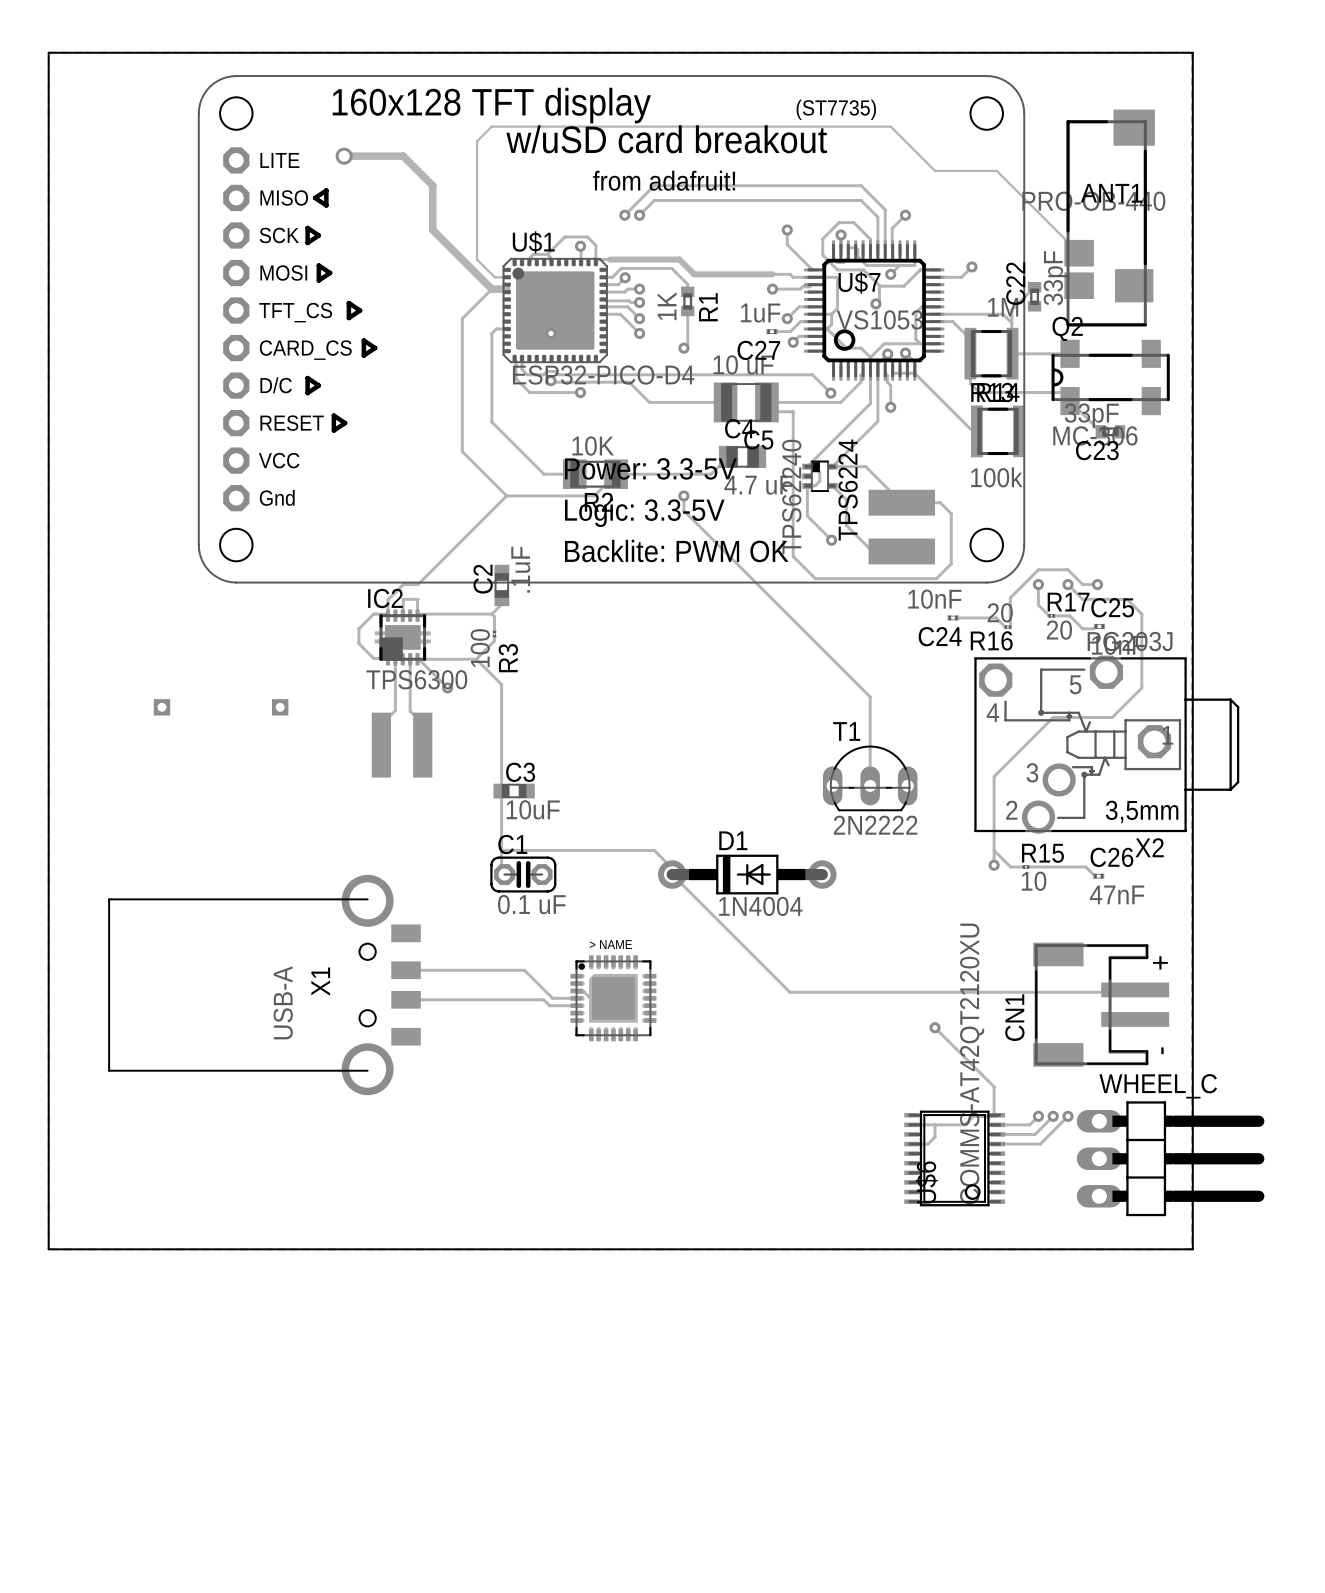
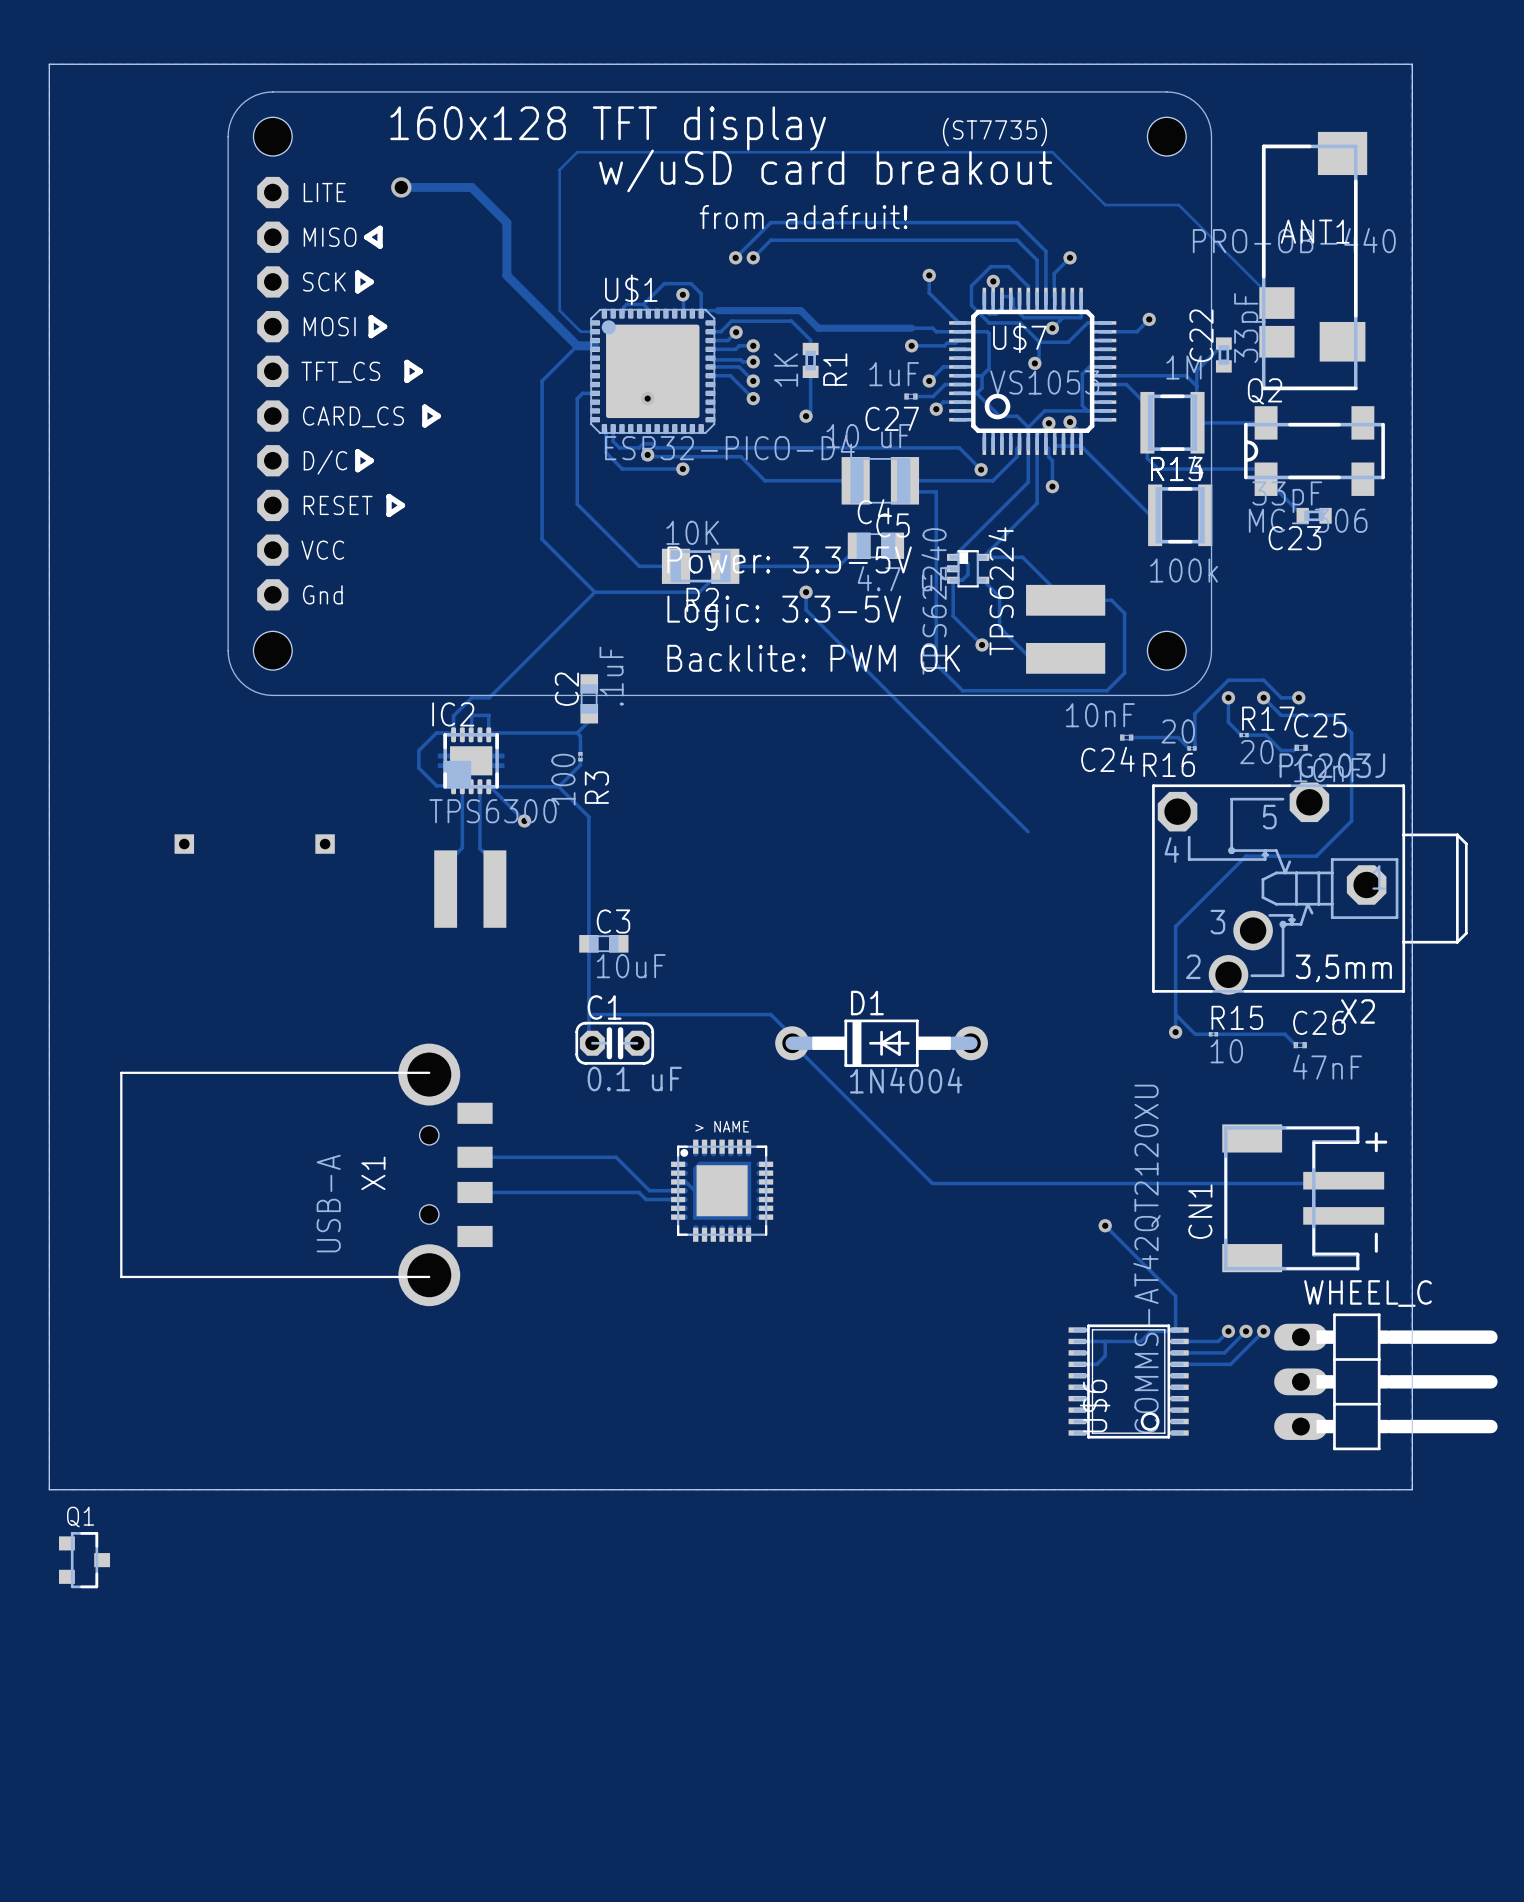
track: (870, 696) (870, 785) -> none
T1: 2N2222 (870, 778) -> none
Q1: none -> (84, 1560)

